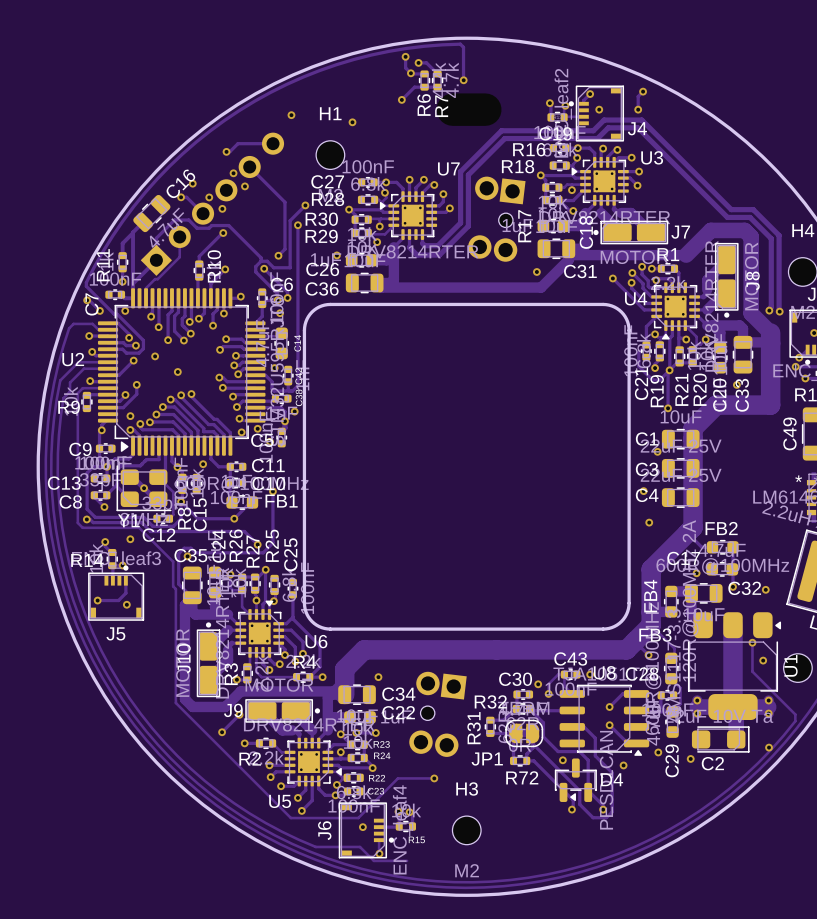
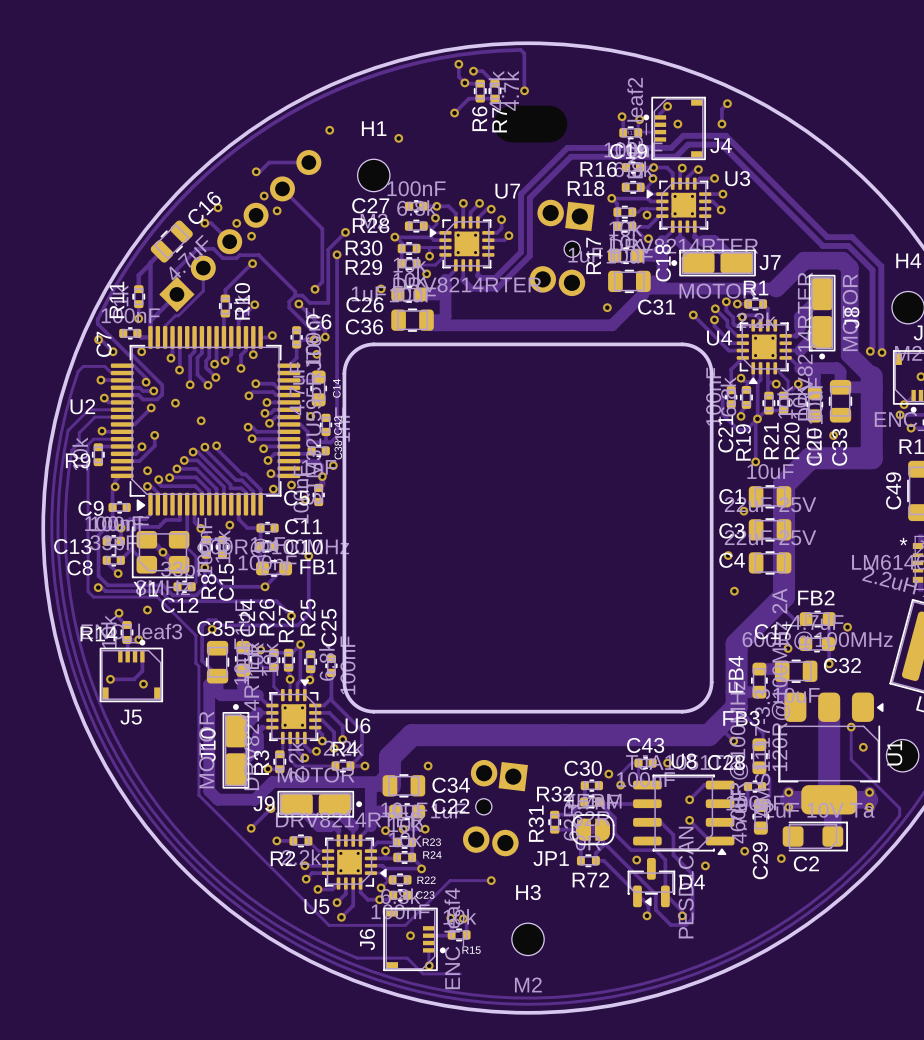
via position: (765, 589) -> (847, 627)
via: (769, 747) -> none

